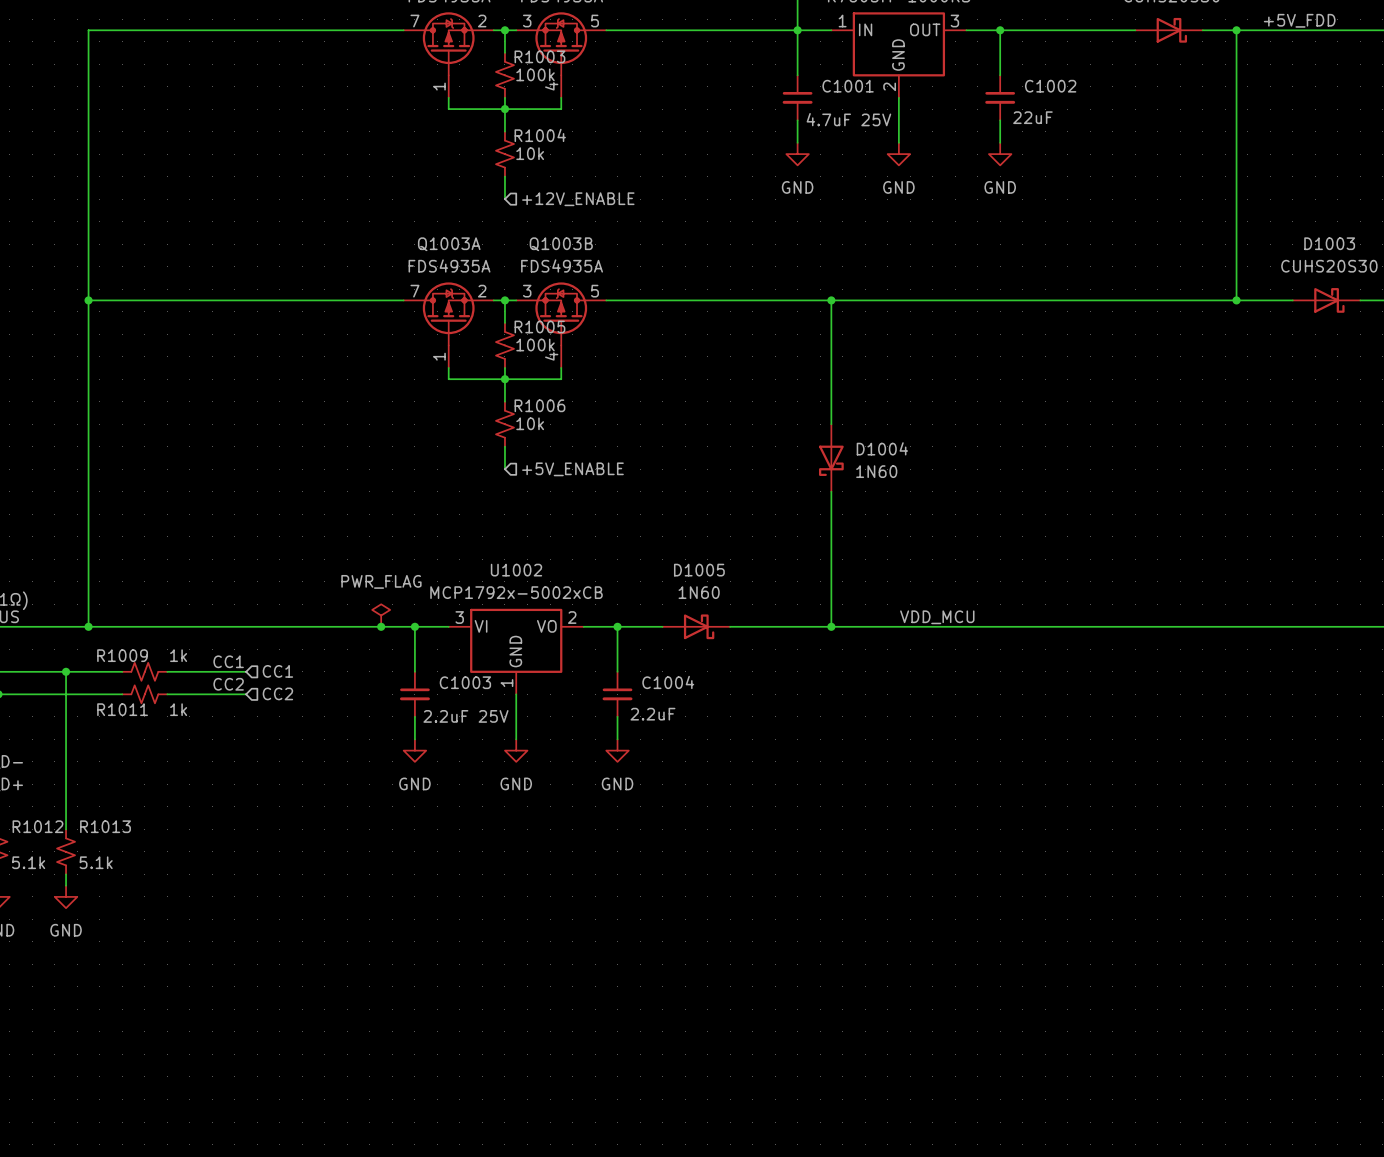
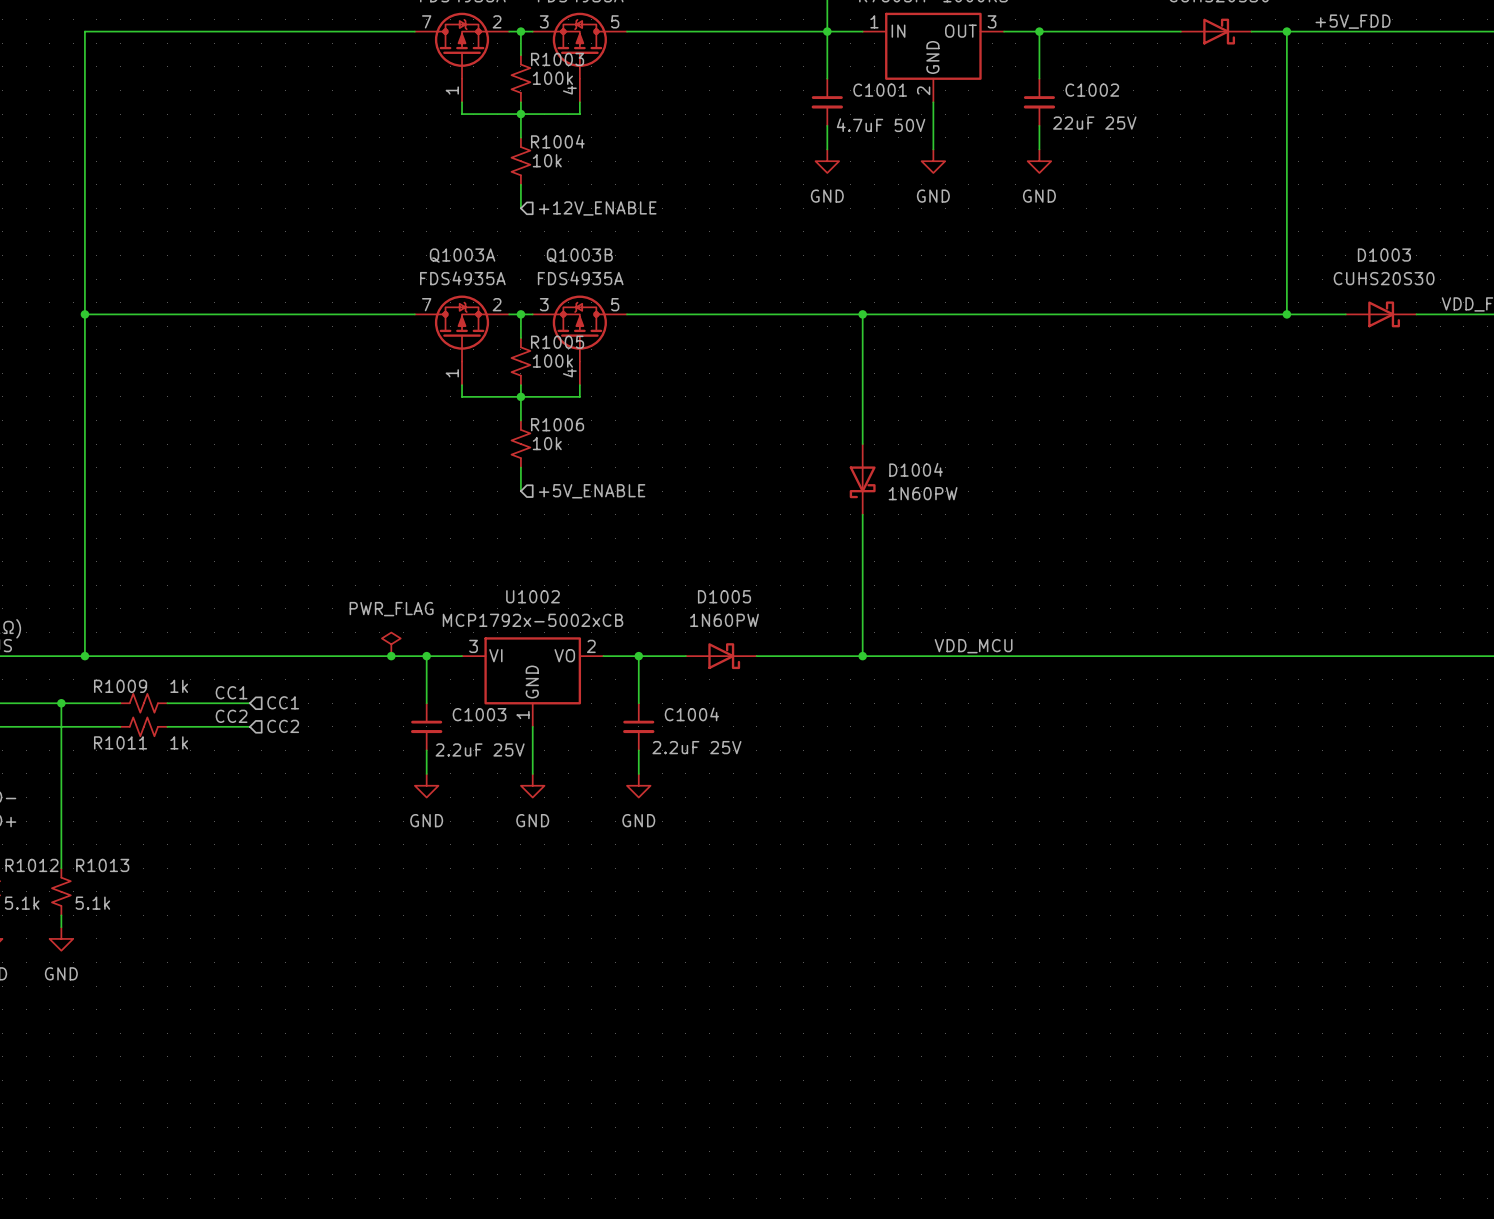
C1002 value: 22uF (1032, 117) -> 22uF 25V (1094, 123)
C1001 value: 4.7uF 25V (848, 119) -> 4.7uF 50V (881, 125)
D1004 value: 1N60 (876, 471) -> 1N60PW (923, 493)
D1005 value: 1N60 (699, 592) -> 1N60PW (724, 620)
C1004 value: 2.2uF (652, 714) -> 2.2uF 25V (696, 747)

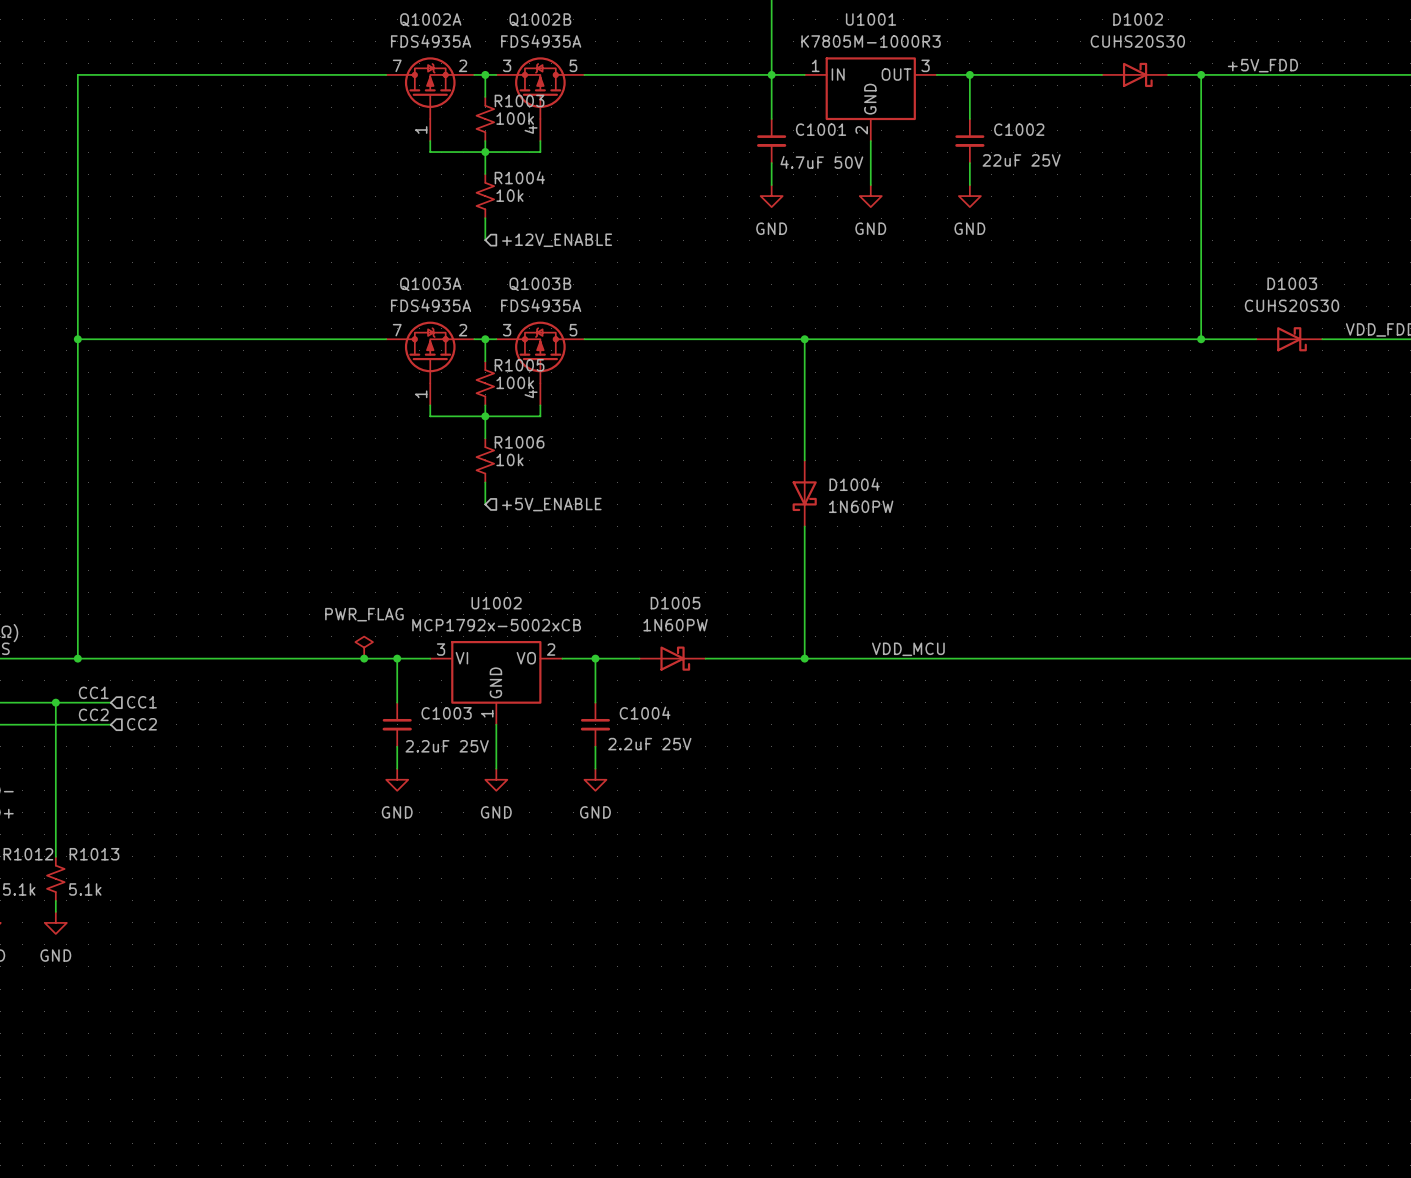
label position: CC1 (231, 692) -> CC1 (93, 692)
hierarchical label position: CC1 (283, 702) -> CC1 (142, 702)
R1009: 1k (143, 703) -> none
wire: (167, 703) (249, 703) -> none
label position: CC2 (231, 716) -> CC2 (93, 714)
R1011: 1k (143, 726) -> none
wire: (167, 726) (249, 726) -> none
hierarchical label position: CC2 (283, 726) -> CC2 (142, 724)

